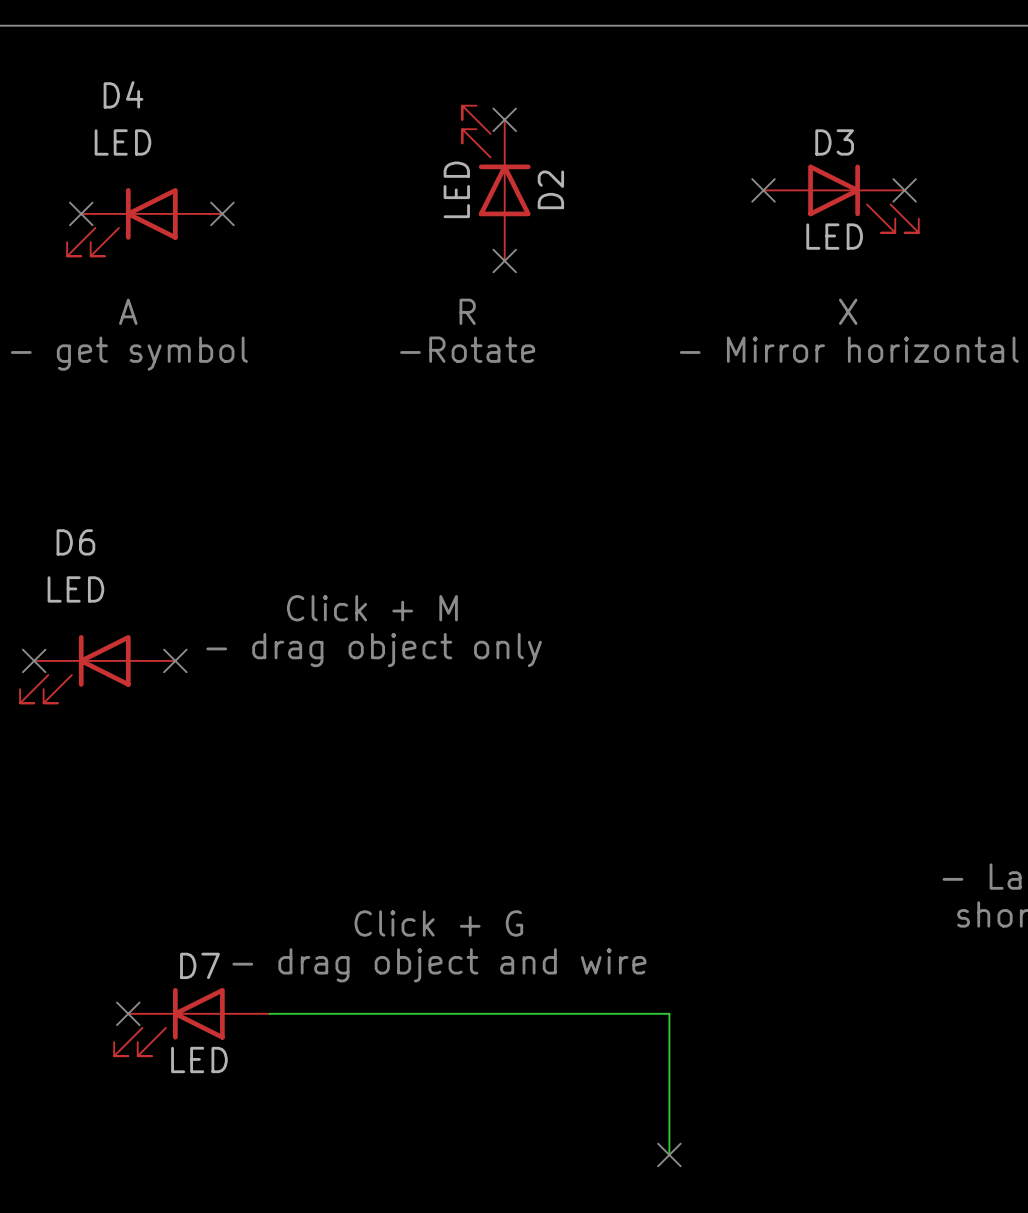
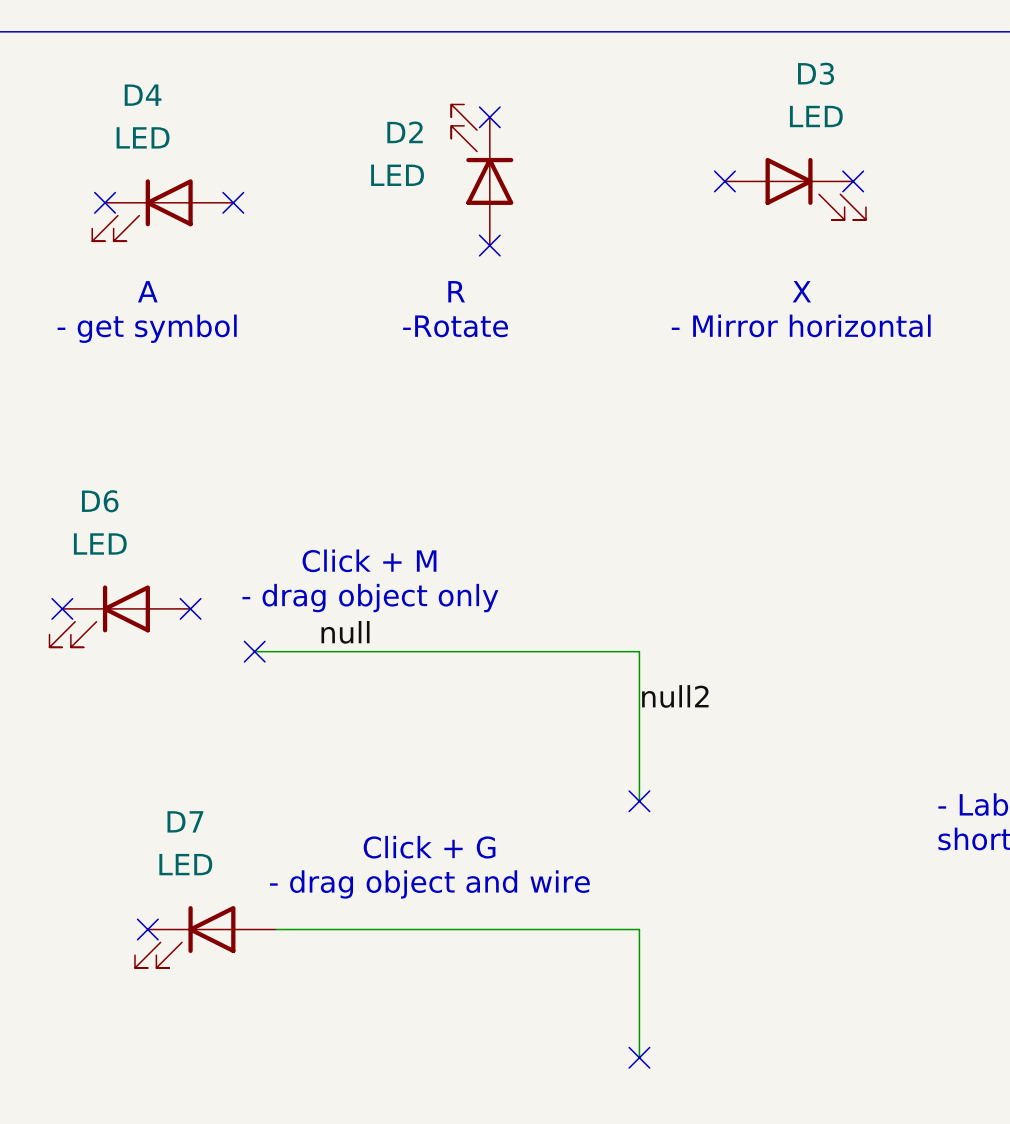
D3 name position: D3 (834, 142) -> D3 (816, 73)
D2 value rotation: 0° (456, 189) -> 90° clockwise (397, 175)
D2 name rotation: 0° (550, 189) -> 90° clockwise (405, 132)
D2 name position: D2 (550, 189) -> D2 (405, 132)
D3 value position: LED (834, 236) -> LED (816, 116)
label: none -> null (345, 632)
wire: none -> (254, 651) (639, 651) (639, 801)
no-connect mark: none -> (254, 651)
label: none -> null2 (675, 696)
no-connect mark: none -> (639, 801)
D7 name position: D7 (199, 965) -> D7 (185, 821)
D7 value position: LED (199, 1059) -> LED (185, 864)

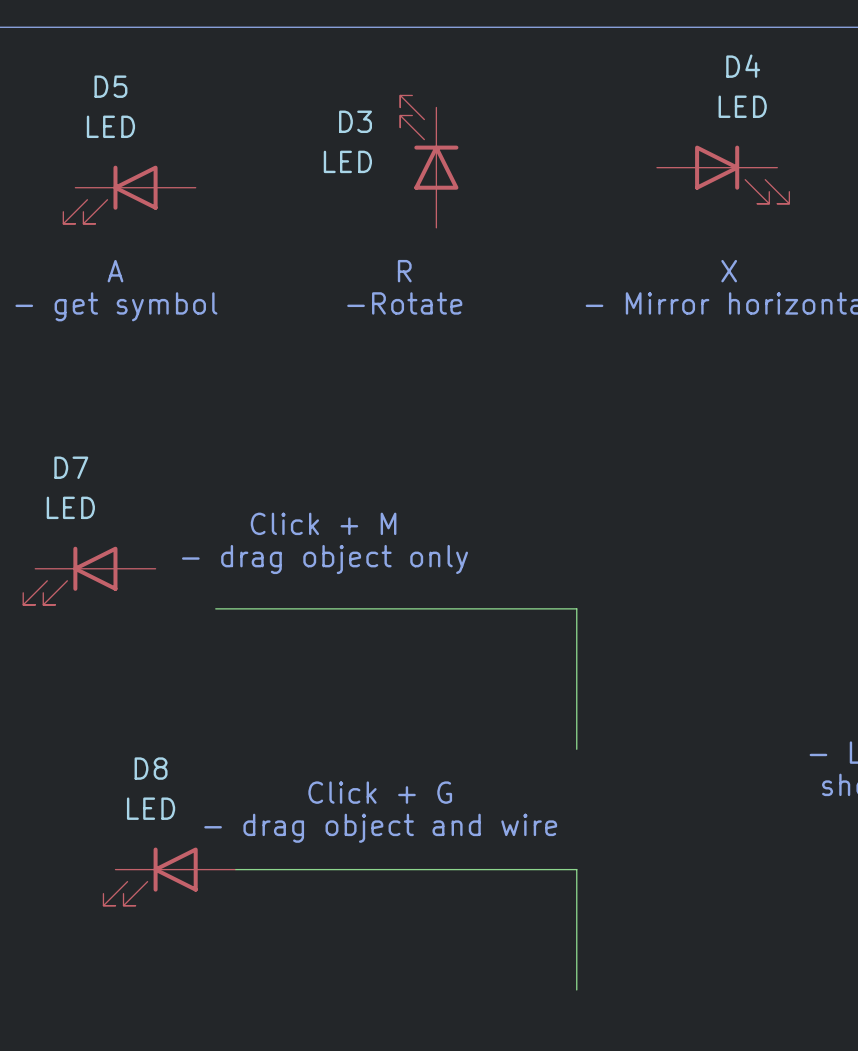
D3 name: D3 (816, 73) -> D4 (743, 66)
D4 name: D4 (143, 95) -> D5 (110, 86)
no-connect mark: (489, 117) -> none
D2 name: D2 (405, 132) -> D3 (355, 121)
no-connect mark: (724, 181) -> none
no-connect mark: (853, 181) -> none
no-connect mark: (105, 202) -> none
no-connect mark: (233, 202) -> none
no-connect mark: (489, 245) -> none
D6 name: D6 (100, 501) -> D7 (71, 467)
no-connect mark: (62, 608) -> none
no-connect mark: (190, 608) -> none
label: null (345, 632) -> none
no-connect mark: (254, 651) -> none
label: null2 (675, 696) -> none
no-connect mark: (639, 801) -> none
D7 name: D7 (185, 821) -> D8 (151, 768)
no-connect mark: (147, 929) -> none
no-connect mark: (639, 1057) -> none

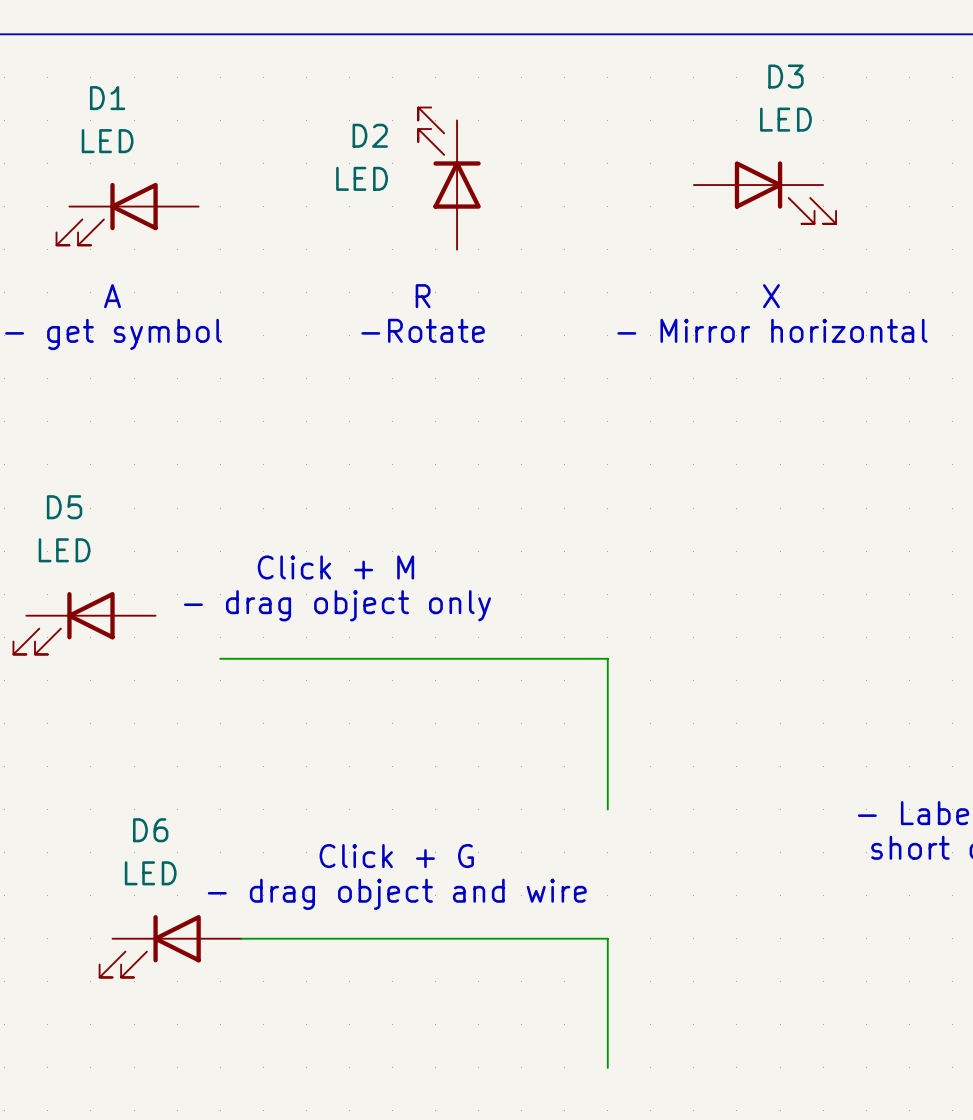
D4 name: D4 (743, 66) -> D3 (785, 76)
D5 name: D5 (110, 86) -> D1 (107, 98)
D3 name: D3 (355, 121) -> D2 (370, 135)
D7 name: D7 (71, 467) -> D5 (64, 507)
D8 name: D8 (151, 768) -> D6 (150, 830)

